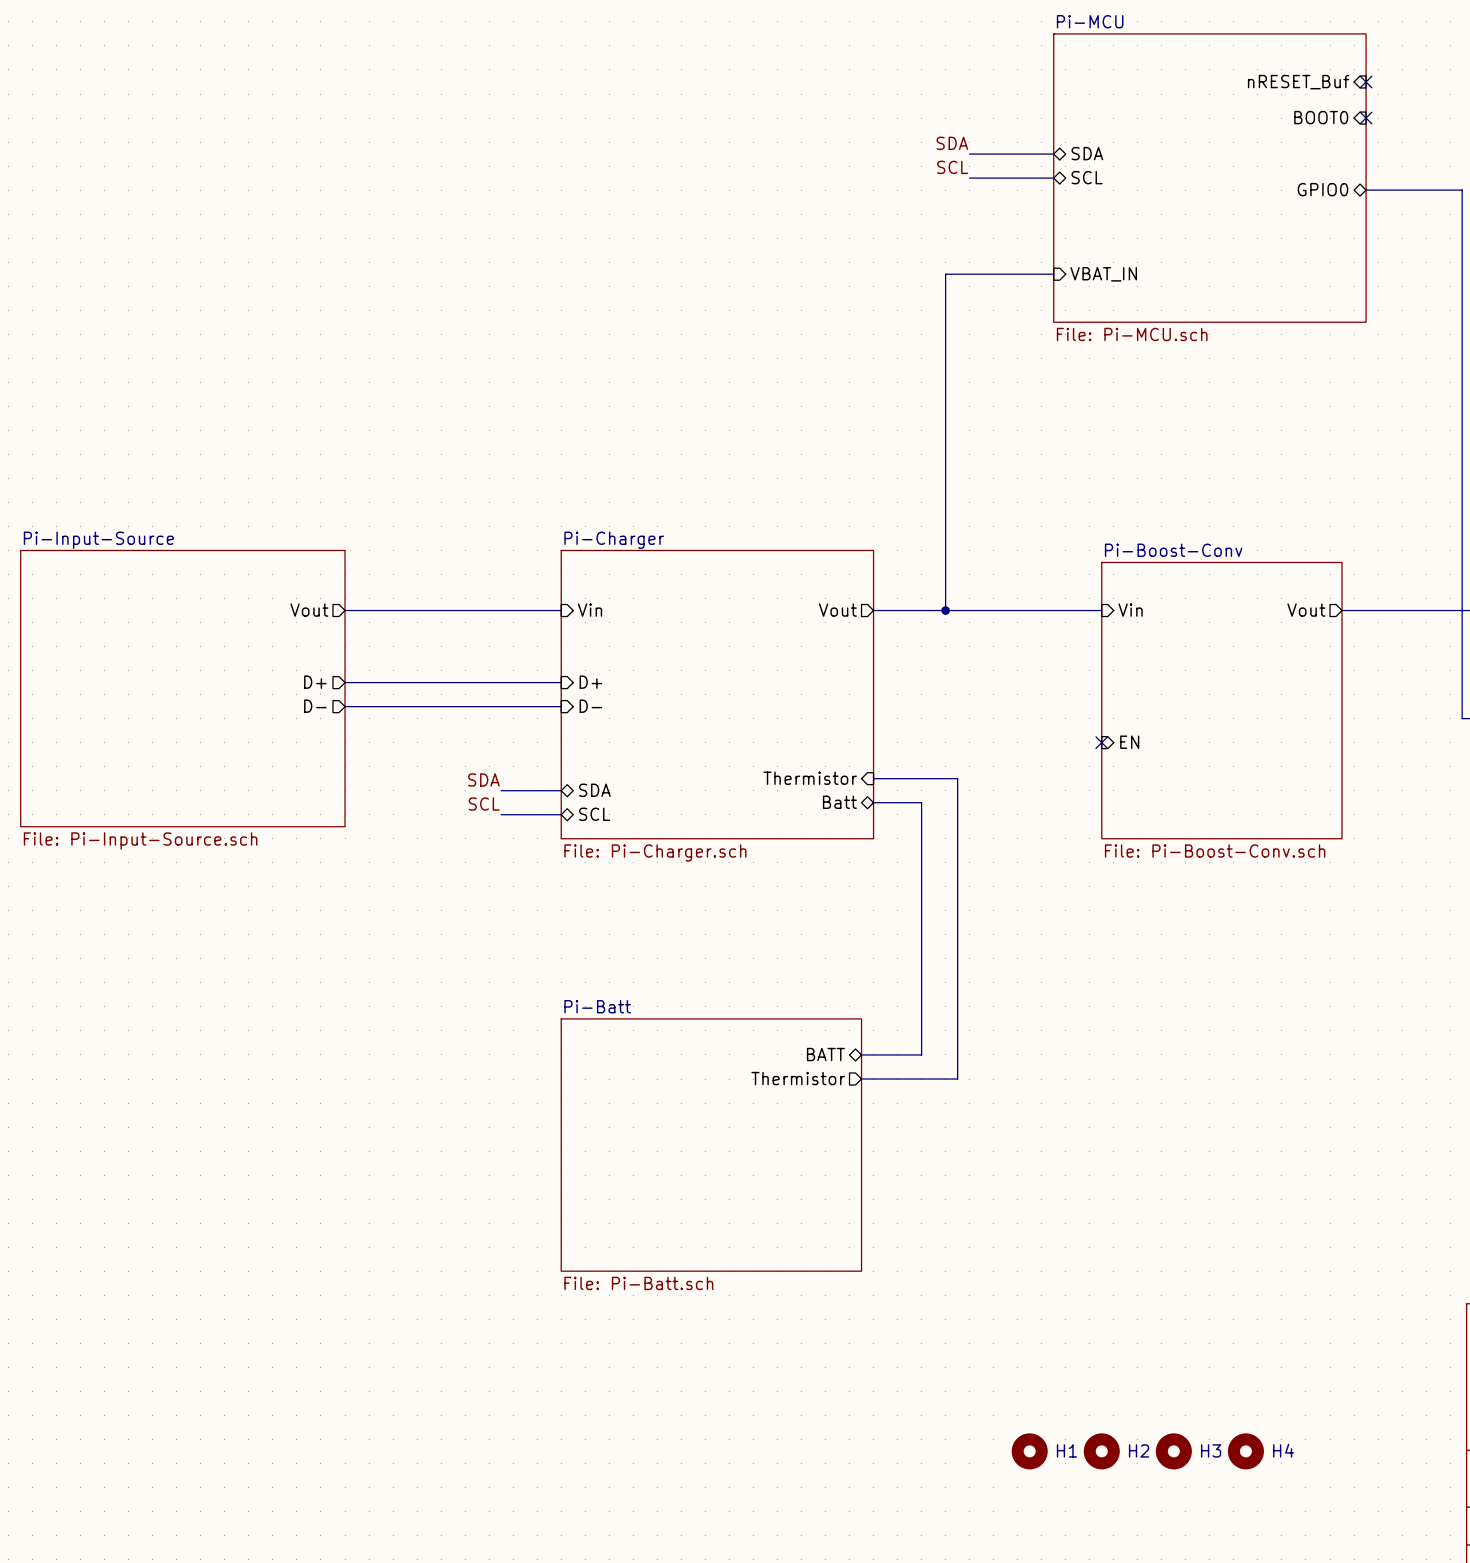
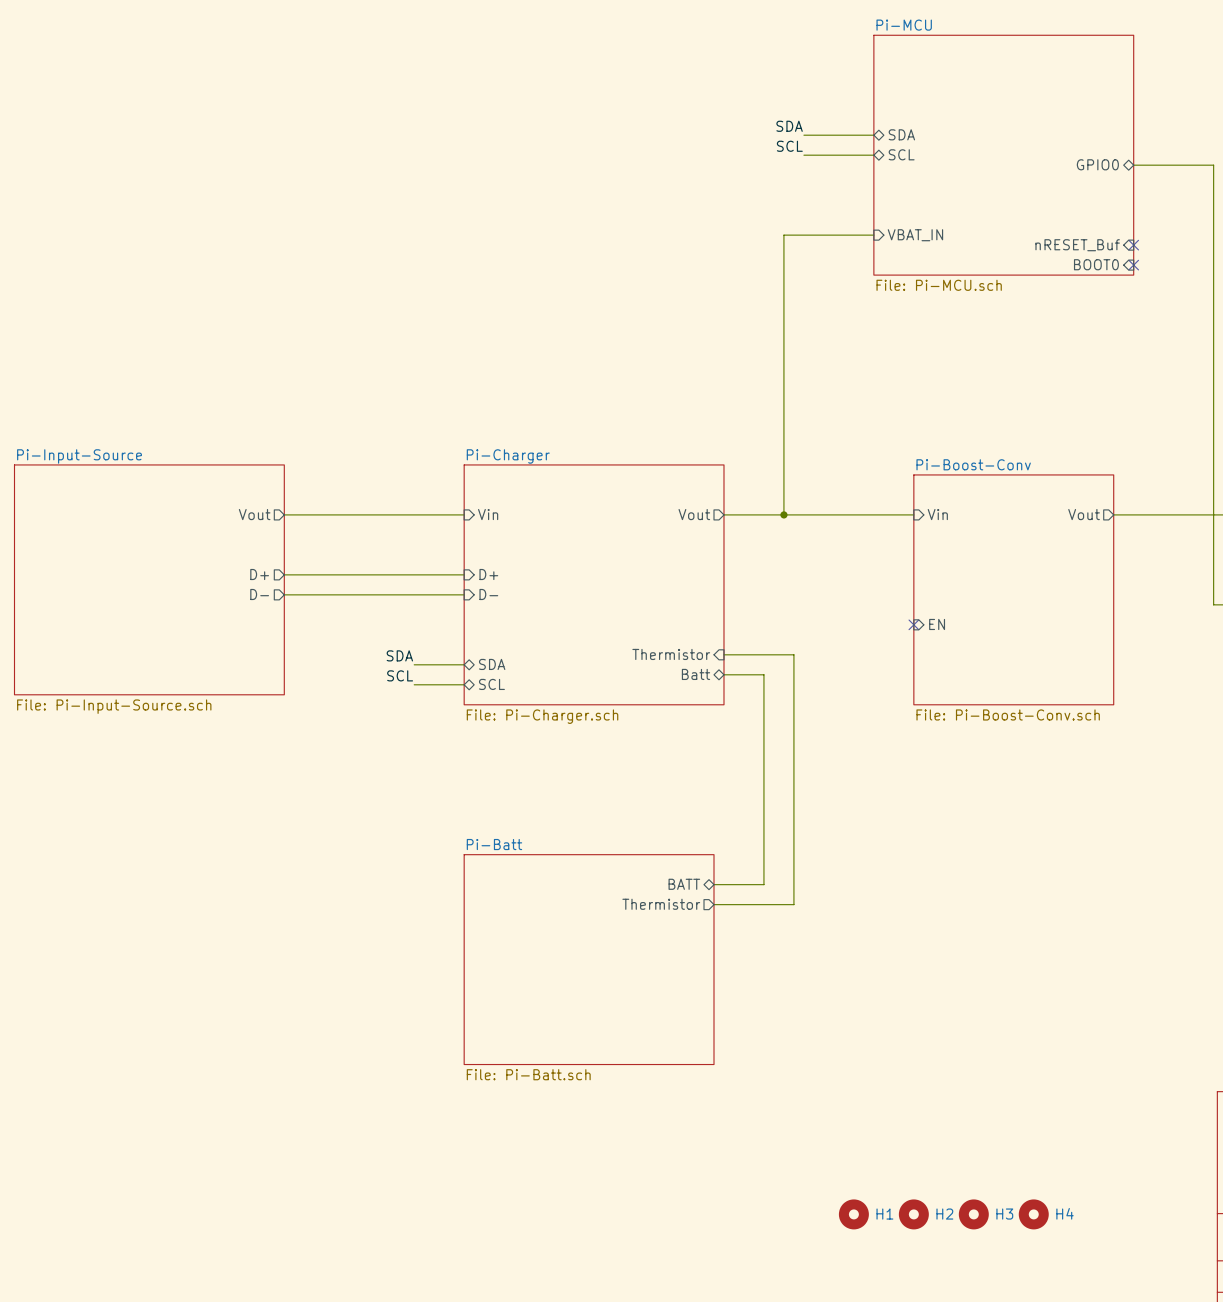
no-connect mark: (1366, 81) -> none
sheet pin position: nRESET_Buf (1298, 82) -> nRESET_Buf (1077, 245)
sheet pin position: BOOT0 (1321, 117) -> BOOT0 (1096, 264)
no-connect mark: (1366, 118) -> none
no-connect mark: none -> (1133, 245)
no-connect mark: none -> (1133, 265)

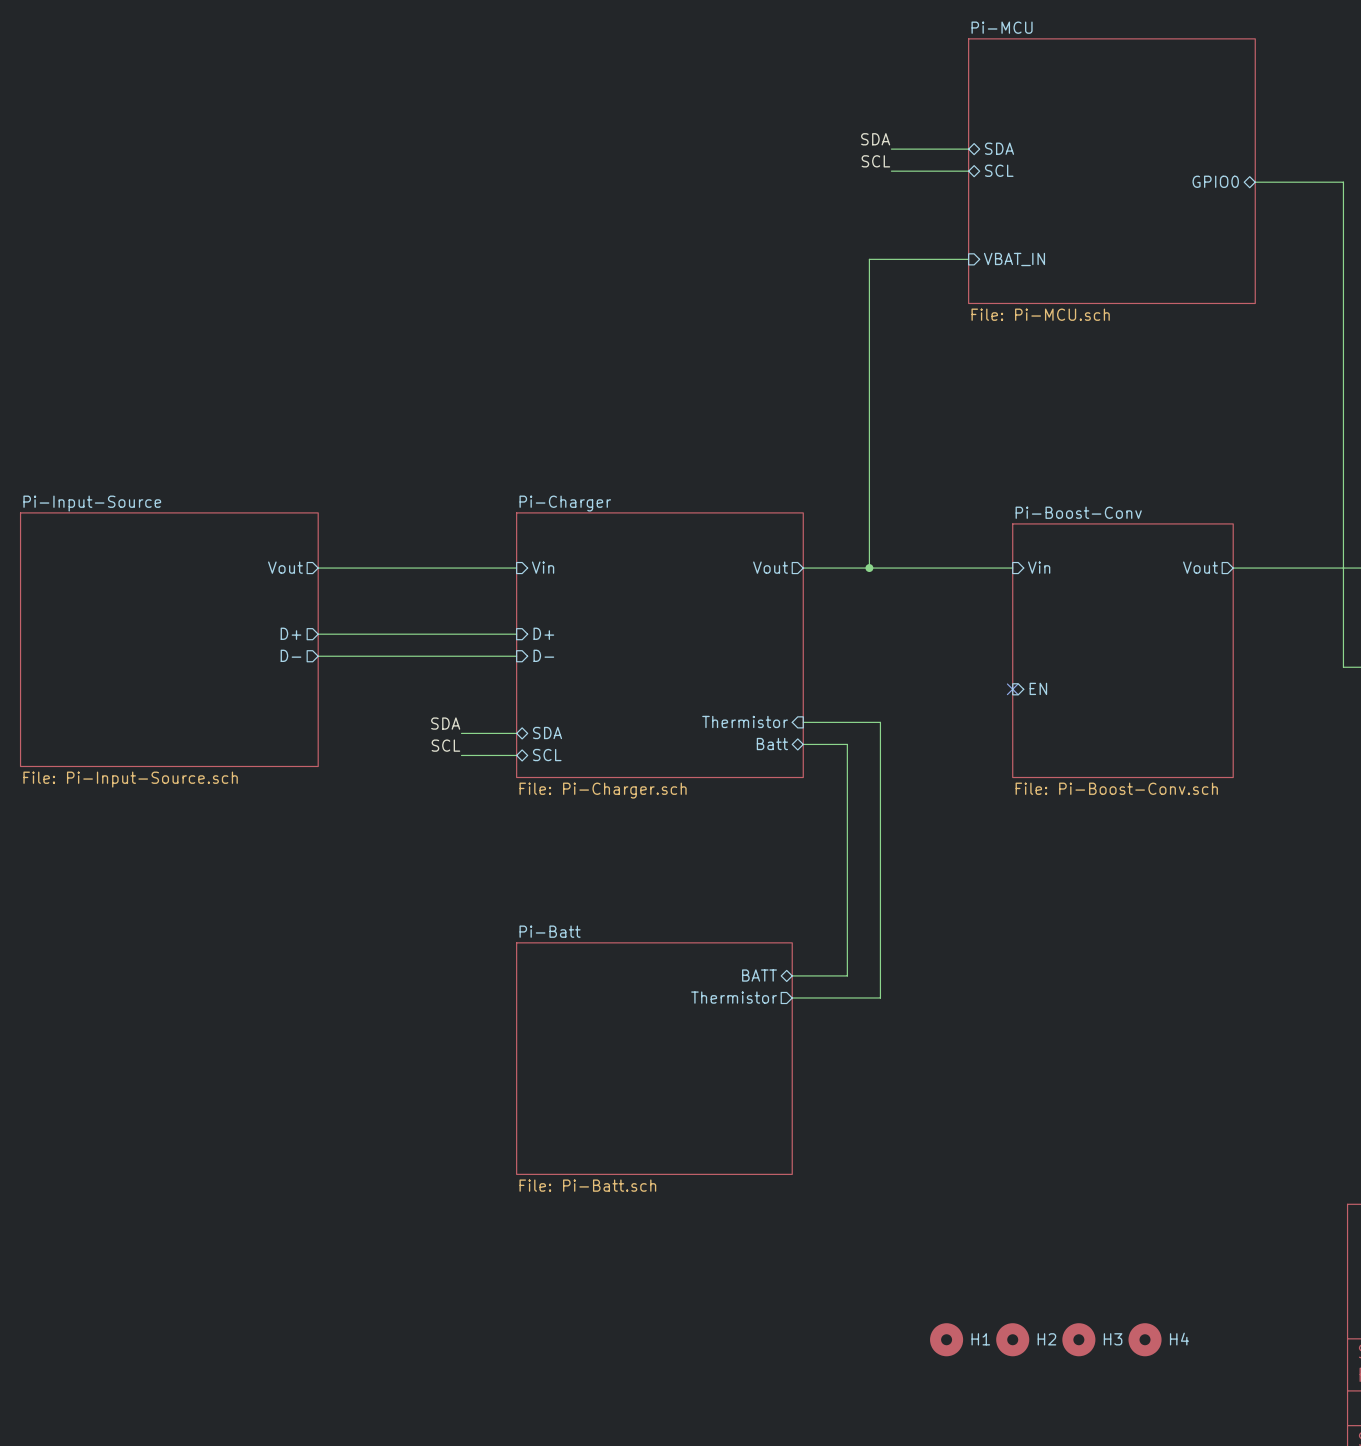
sheet pin: nRESET_Buf (1077, 245) -> none
no-connect mark: (1133, 245) -> none
sheet pin: BOOT0 (1096, 264) -> none
no-connect mark: (1133, 265) -> none

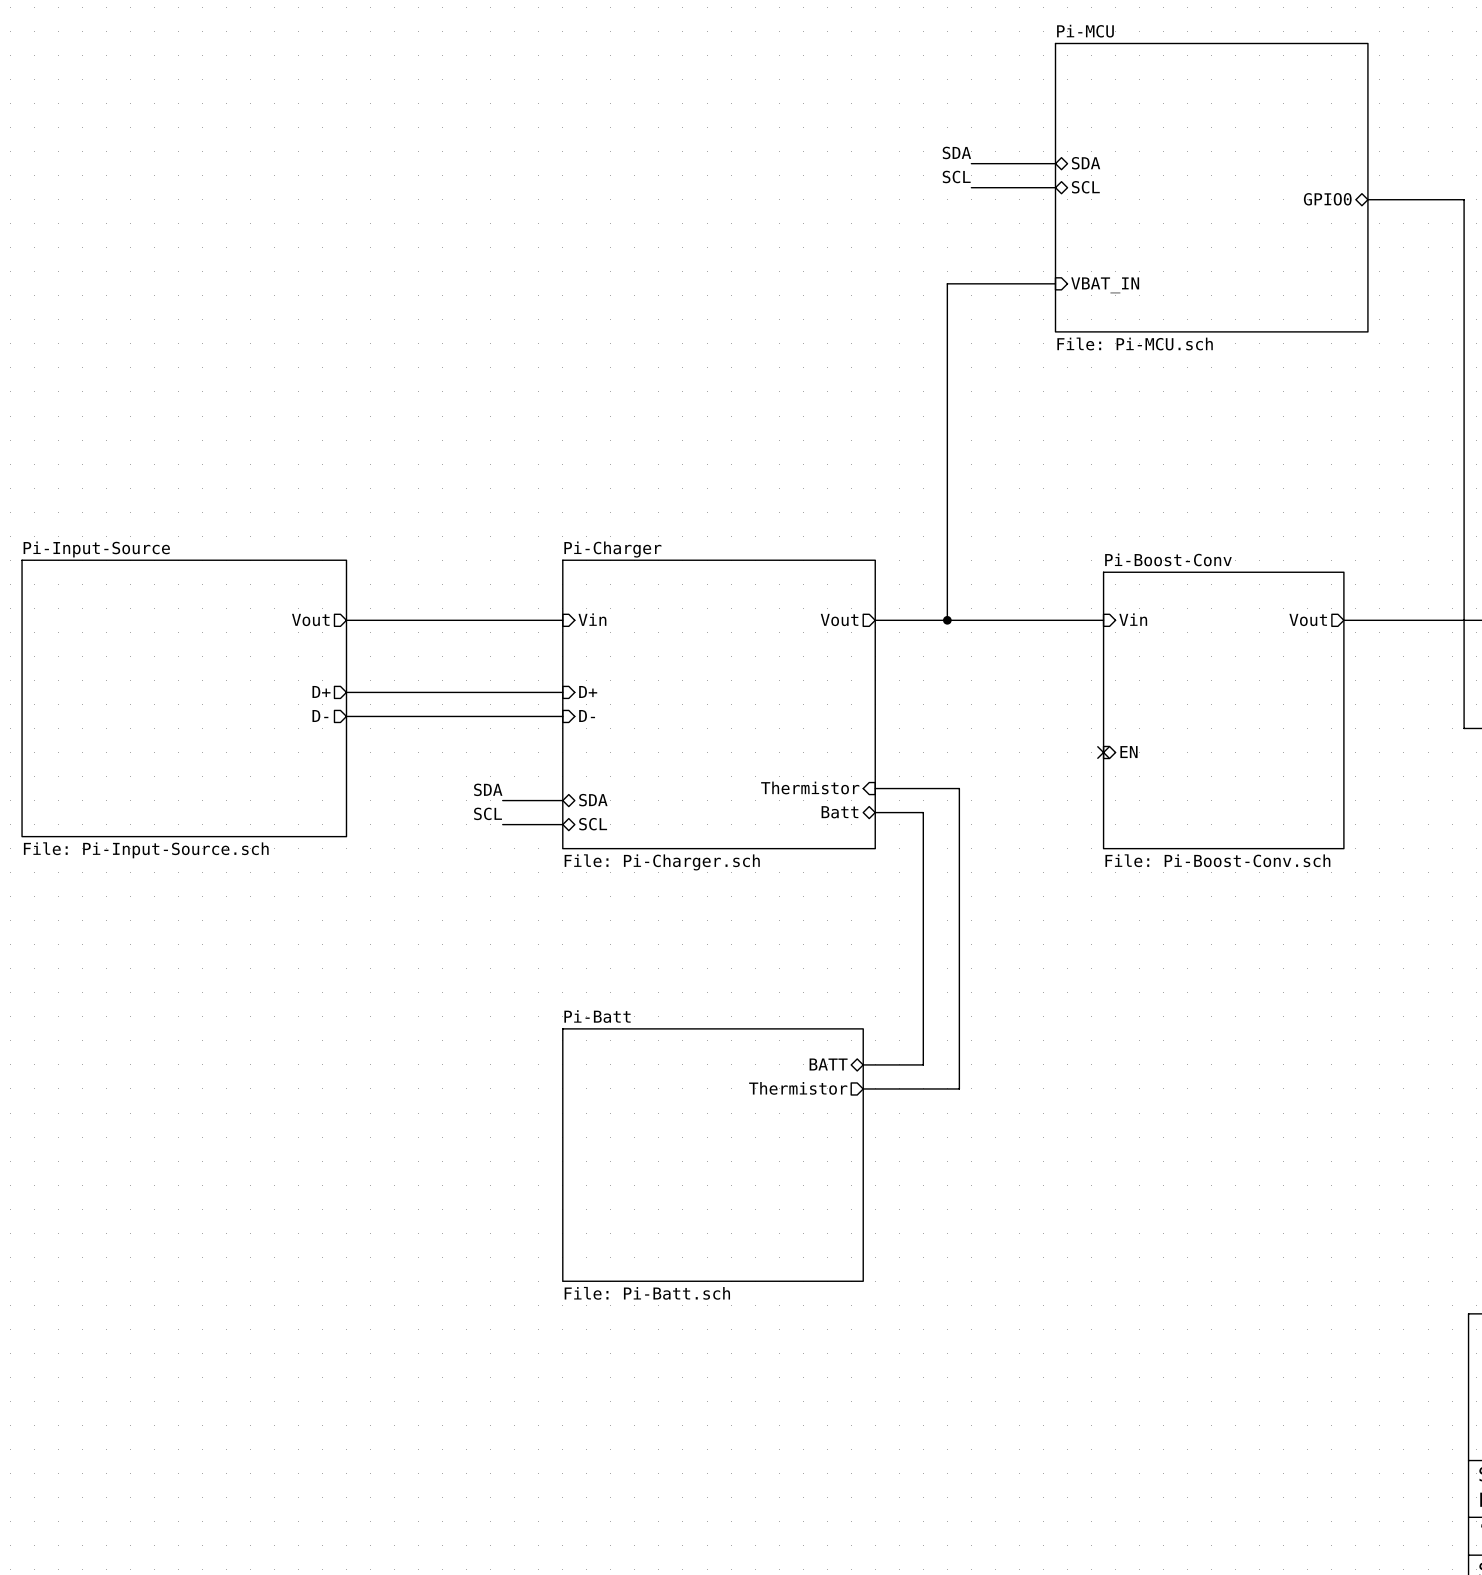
H1: (946, 1339) -> none
H2: (1012, 1339) -> none
H3: (1078, 1339) -> none
H4: (1145, 1339) -> none

